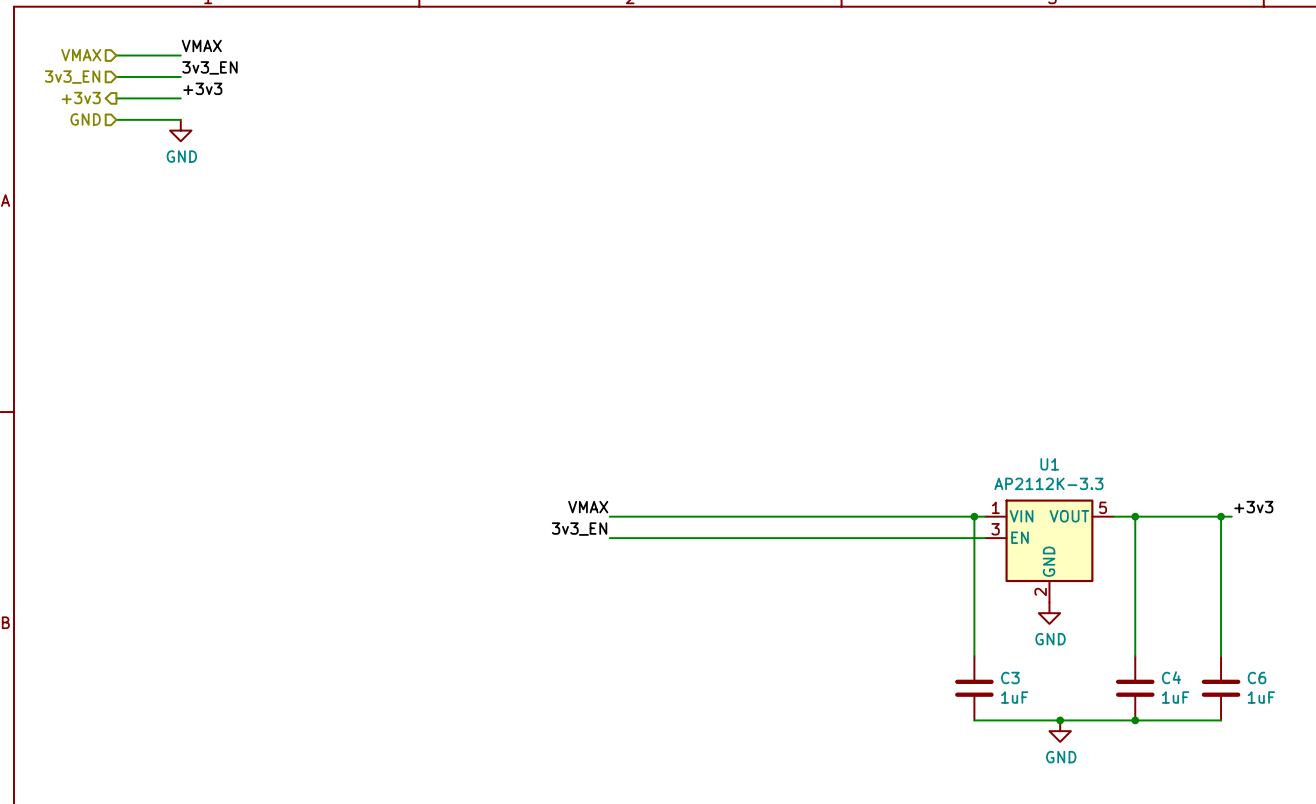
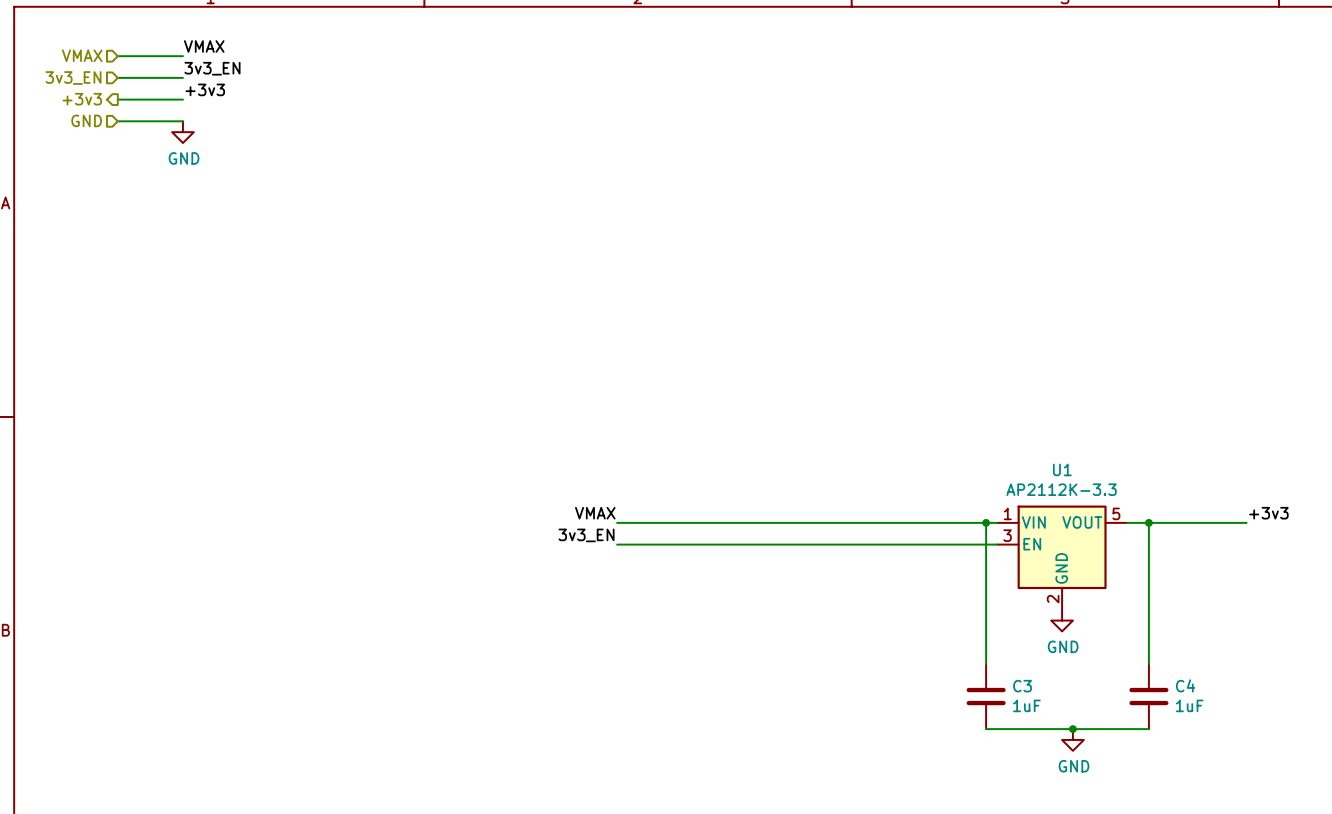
wire: (1221, 516) (1221, 656) -> none
junction: (1221, 516) -> none
C6: 1uF (1221, 688) -> none
wire: (1135, 720) (1221, 720) -> none
junction: (1135, 720) -> none

